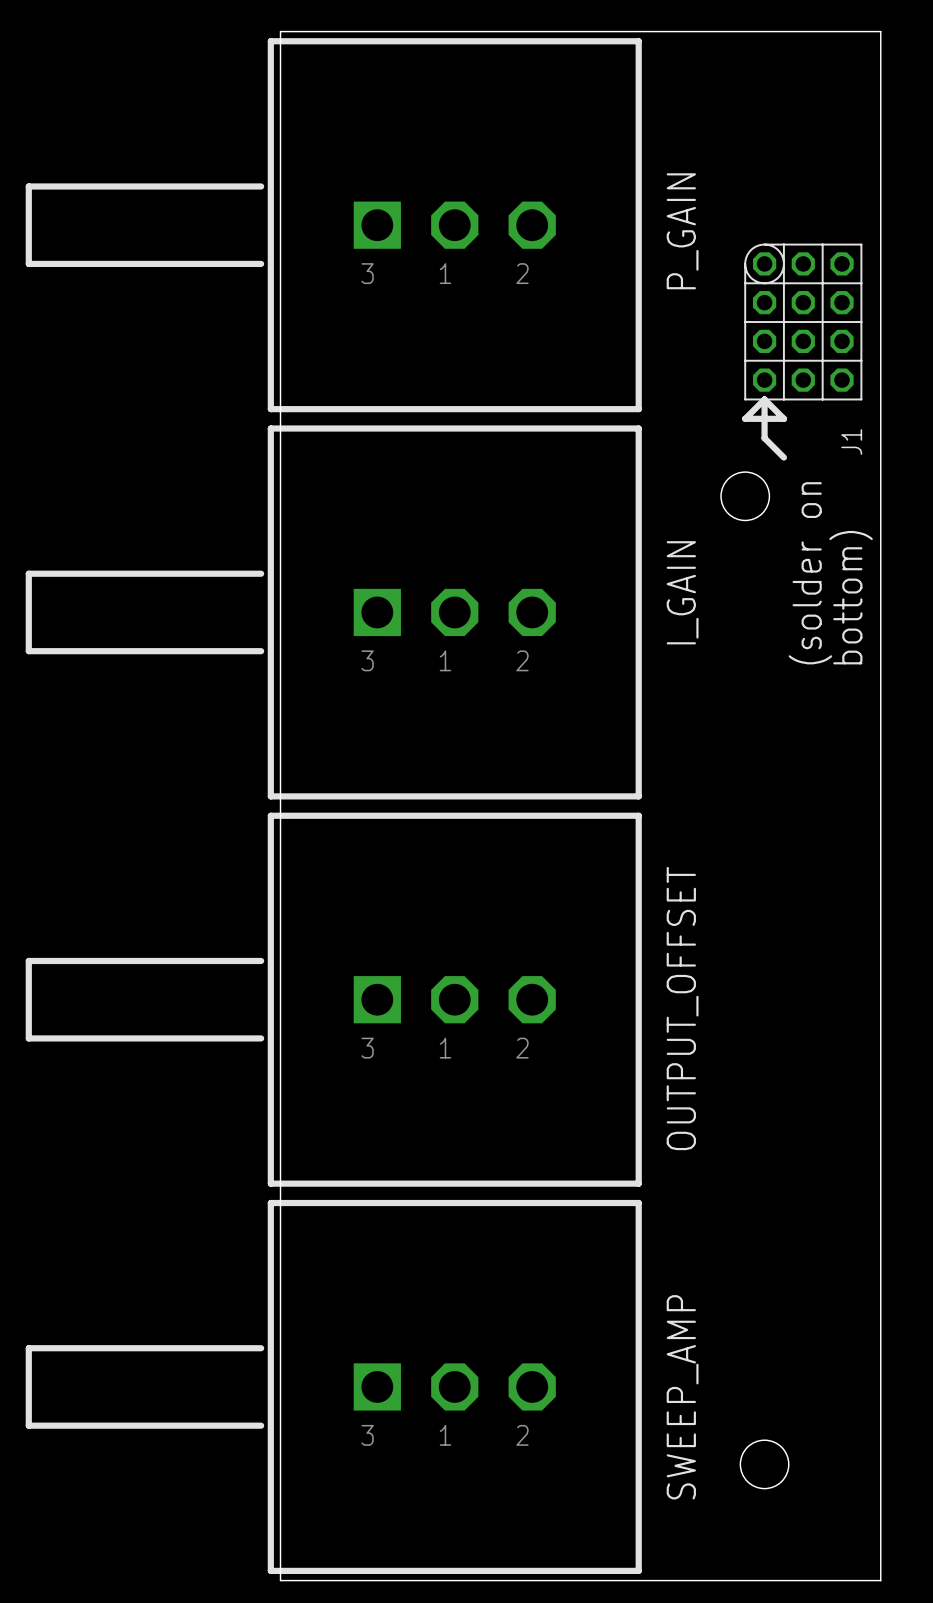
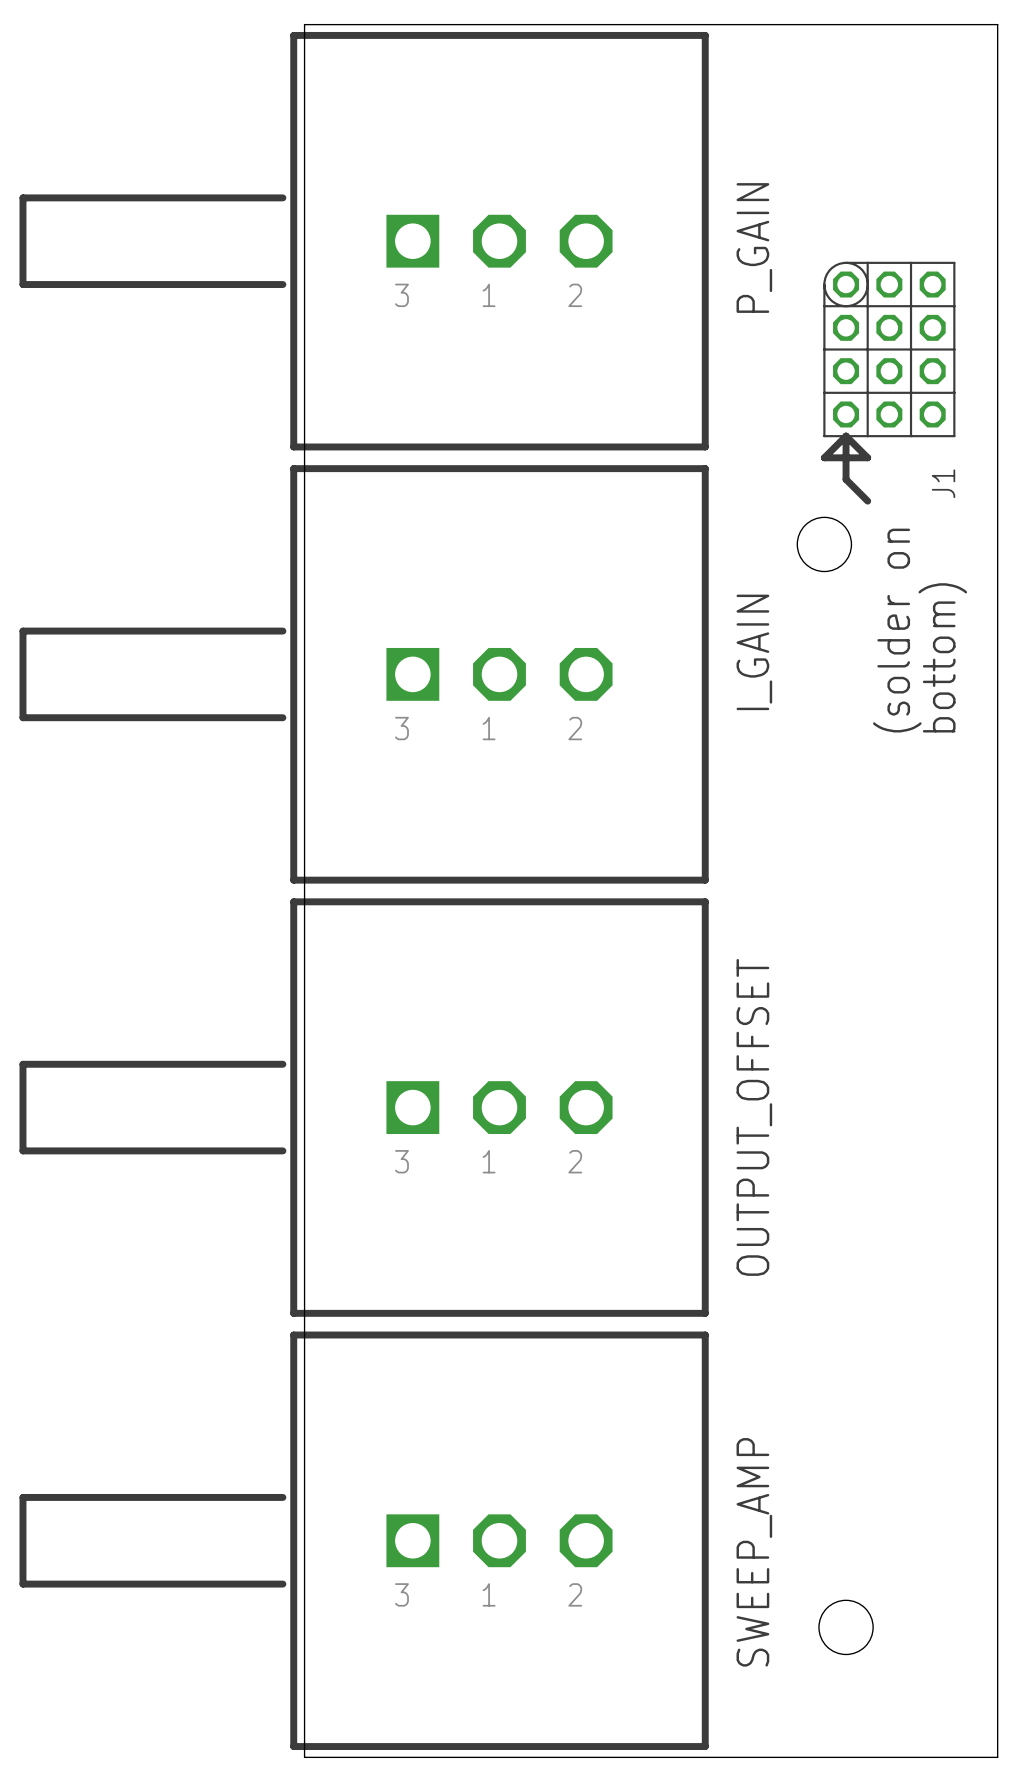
board edge: (880, 31) (880, 1580) -> (976, 24) (997, 24) (997, 1757) (976, 1757)

